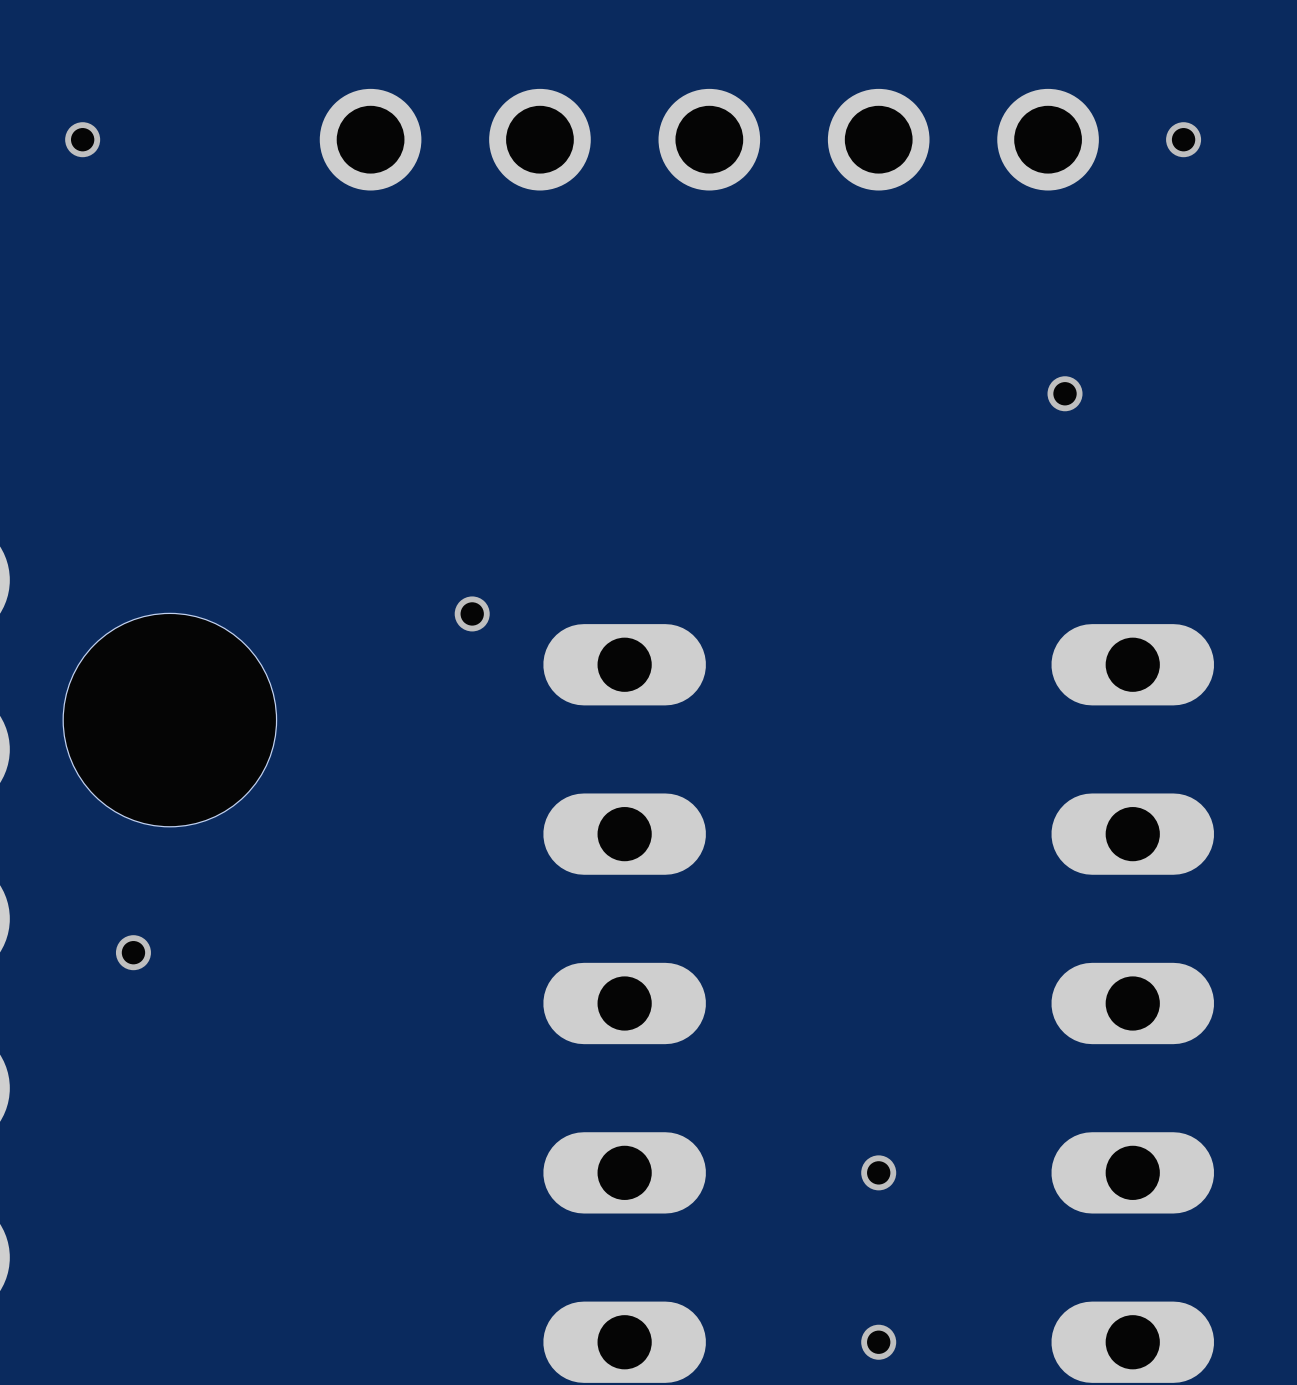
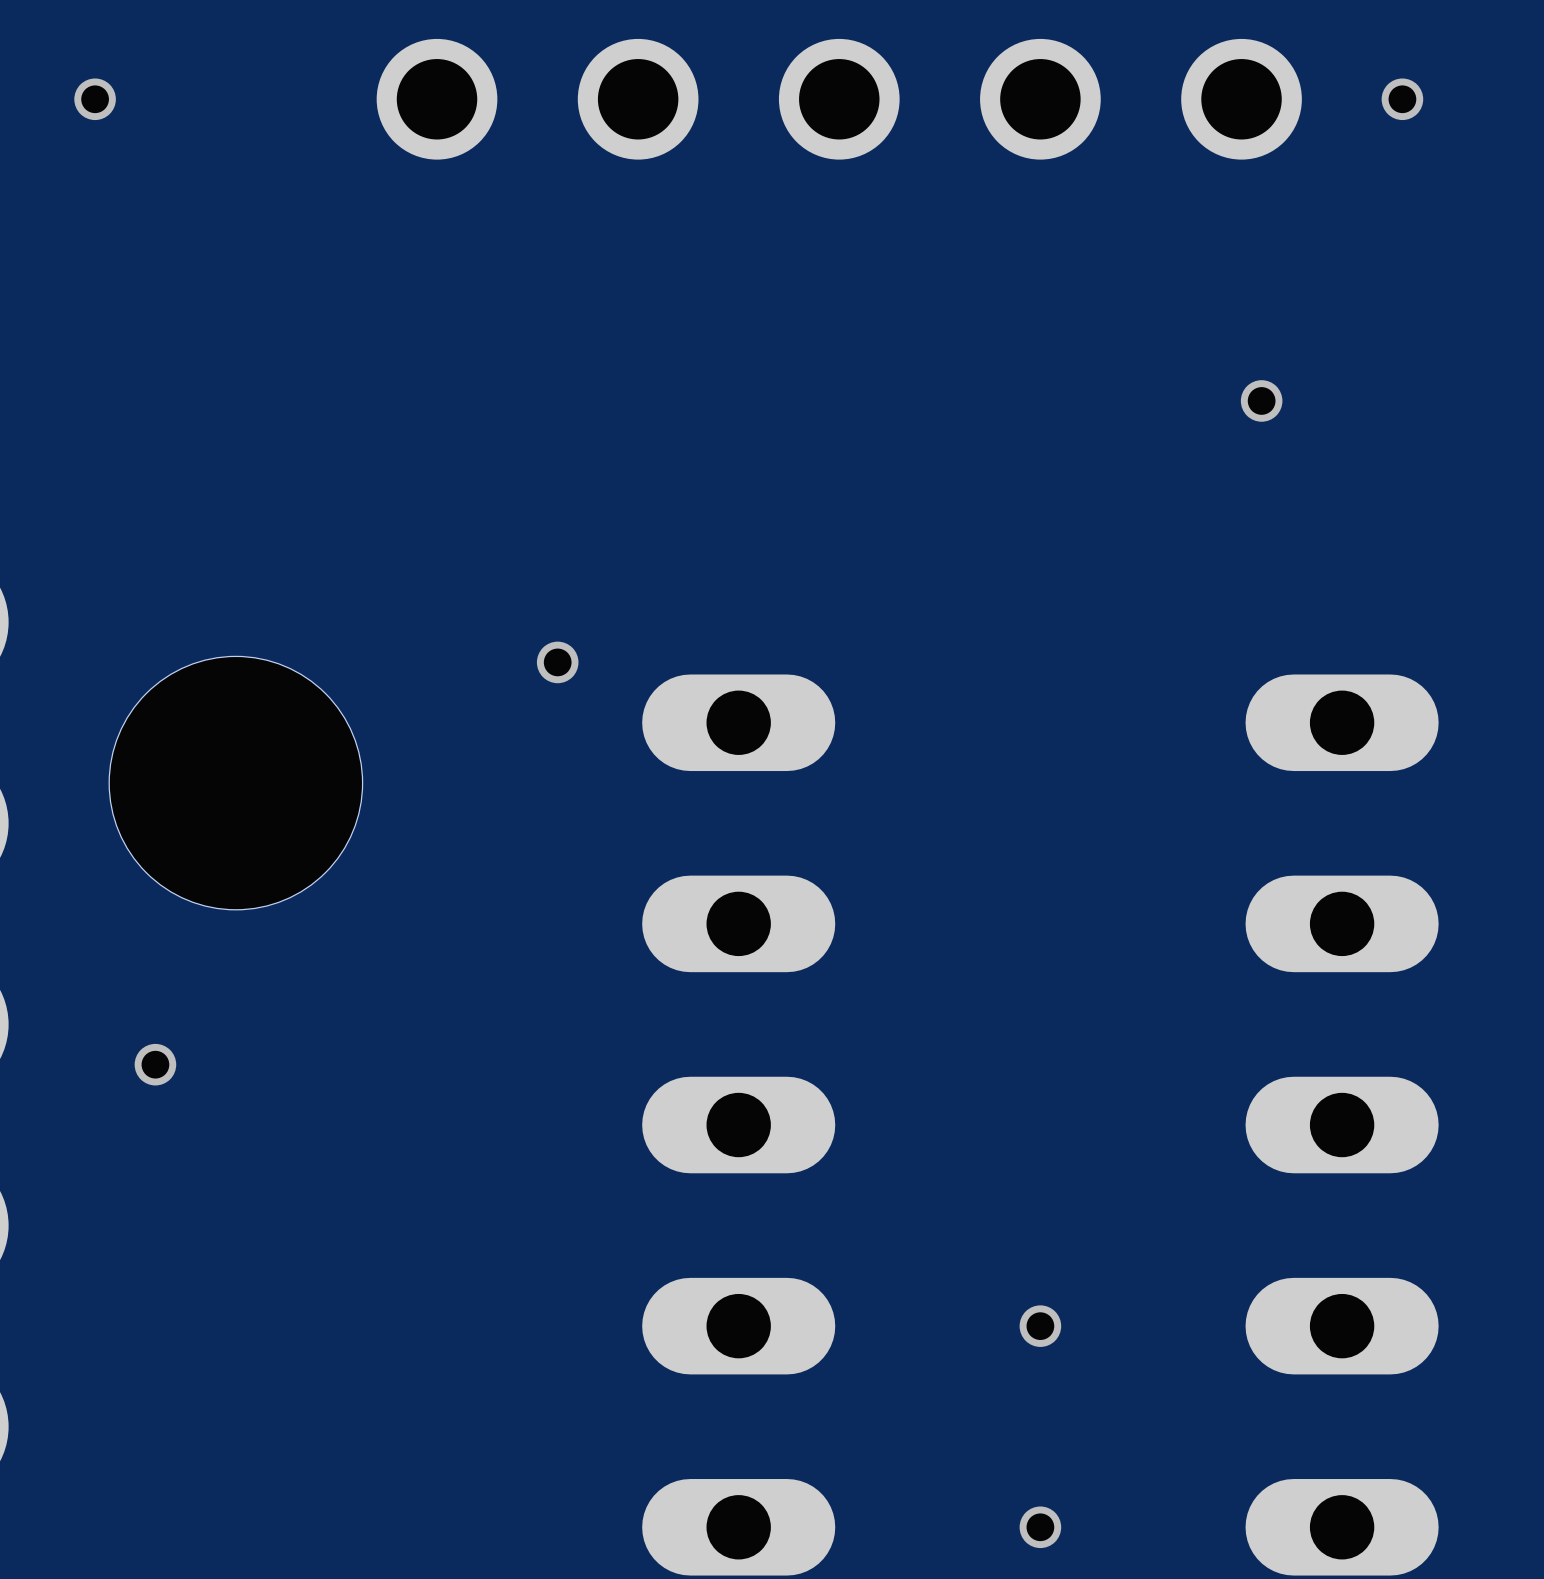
hole position: (169, 720) -> (235, 783)

